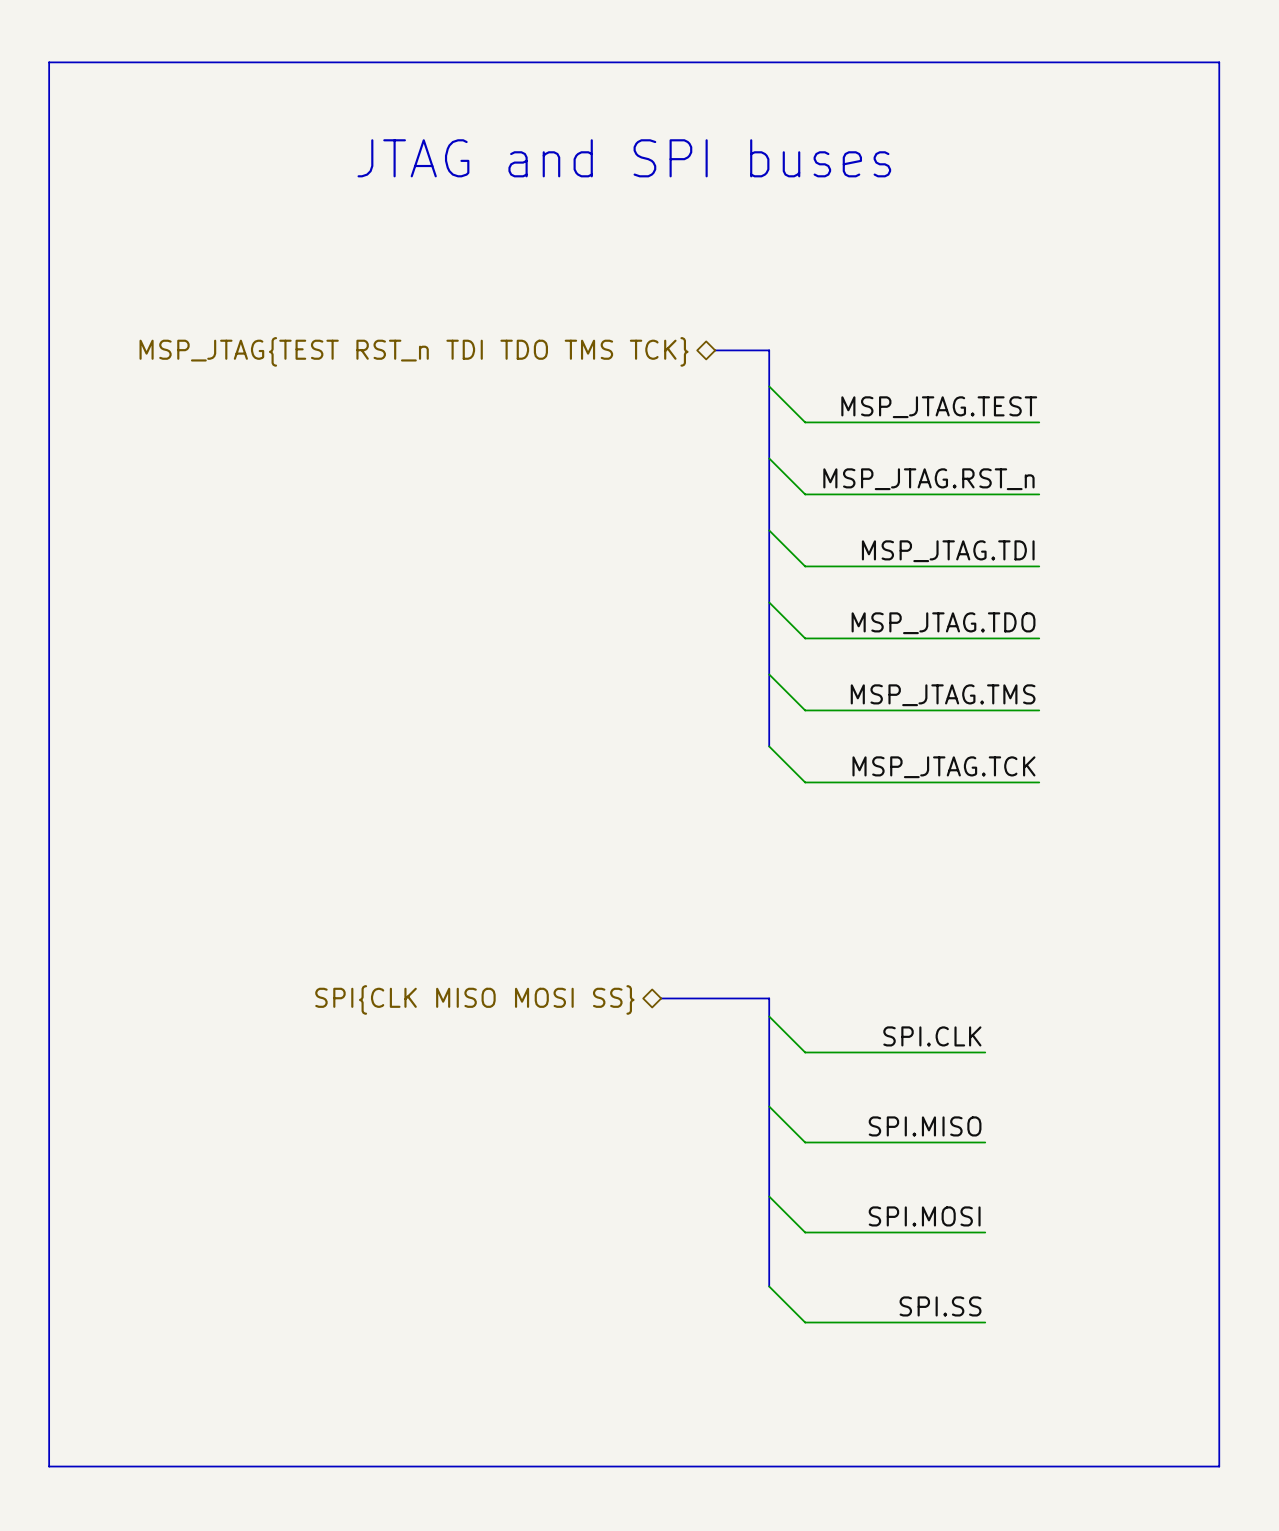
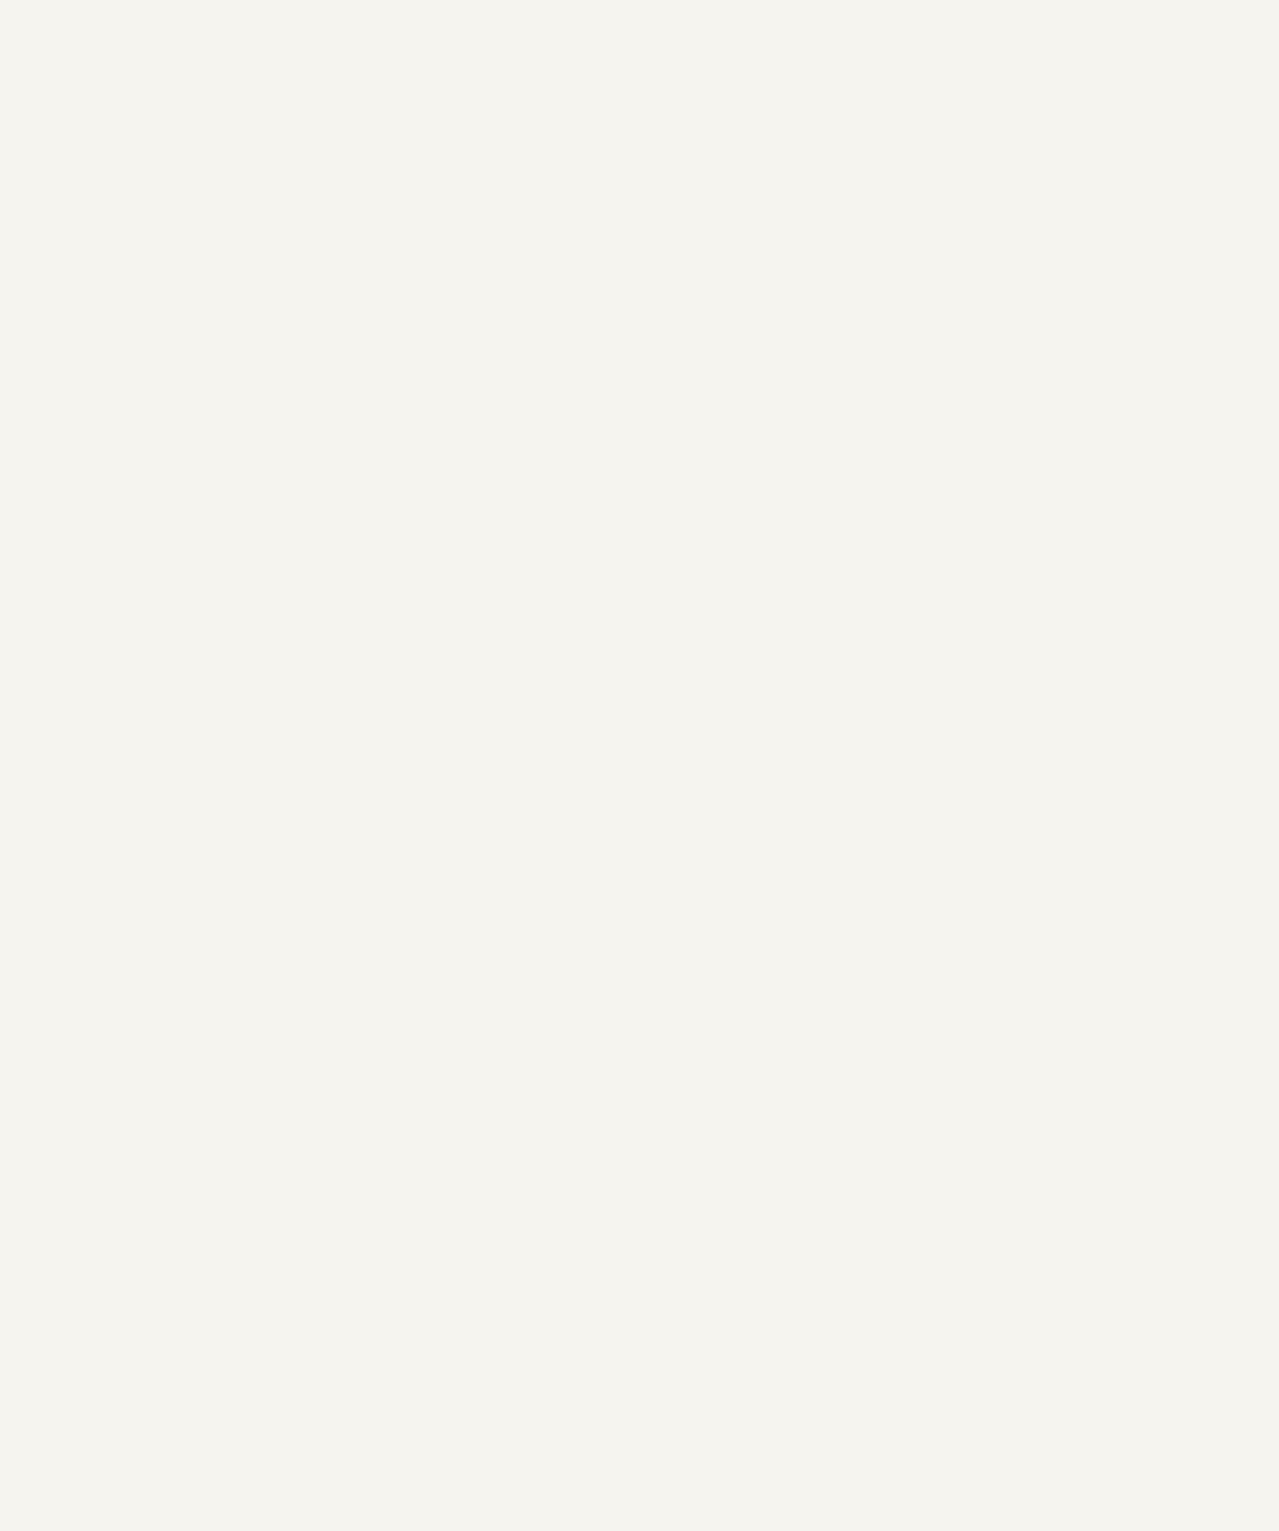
line: (49, 62) (1219, 62) (1219, 1466) (49, 1466) (49, 62) -> none
text: JTAG and SPI buses (624, 158) -> none
bus: (715, 350) (769, 350) (769, 746) -> none
hierarchical label: MSP_JTAG{TEST RST_n TDI TDO TMS TCK} (414, 351) -> none
wire: (769, 386) (805, 422) (1039, 422) -> none
label: MSP_JTAG.TEST (939, 407) -> none
wire: (769, 458) (805, 494) (1039, 494) -> none
label: MSP_JTAG.RST_n (928, 479) -> none
wire: (769, 530) (805, 566) (1039, 566) -> none
label: MSP_JTAG.TDI (948, 551) -> none
wire: (769, 602) (805, 638) (1039, 638) -> none
label: MSP_JTAG.TDO (943, 623) -> none
wire: (769, 674) (805, 710) (1039, 710) -> none
label: MSP_JTAG.TMS (943, 695) -> none
wire: (769, 746) (805, 782) (1039, 782) -> none
label: MSP_JTAG.TCK (943, 767) -> none
bus: (661, 998) (769, 998) (769, 1286) -> none
hierarchical label: SPI{CLK MISO MOSI SS} (474, 999) -> none
wire: (769, 1016) (805, 1052) (985, 1052) -> none
label: SPI.CLK (932, 1036) -> none
wire: (769, 1106) (805, 1142) (985, 1142) -> none
label: SPI.MISO (925, 1126) -> none
wire: (769, 1196) (805, 1232) (985, 1232) -> none
label: SPI.MOSI (924, 1216) -> none
wire: (769, 1286) (805, 1322) (985, 1322) -> none
label: SPI.SS (940, 1306) -> none

